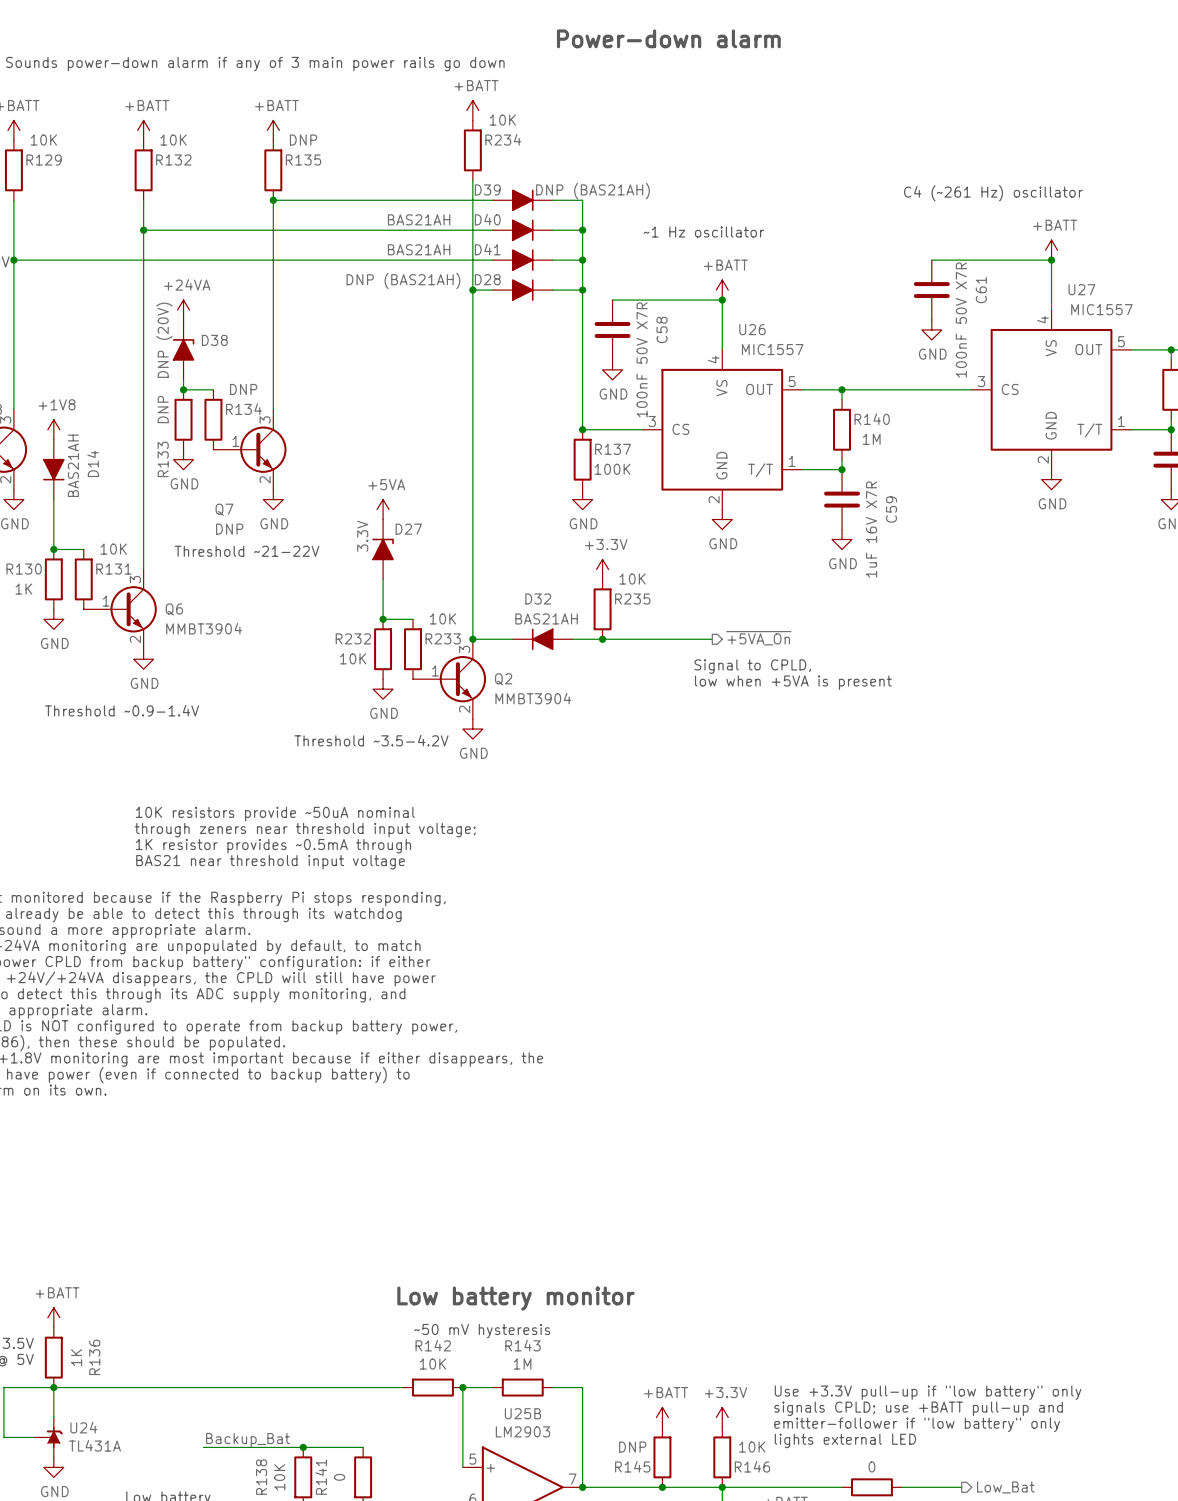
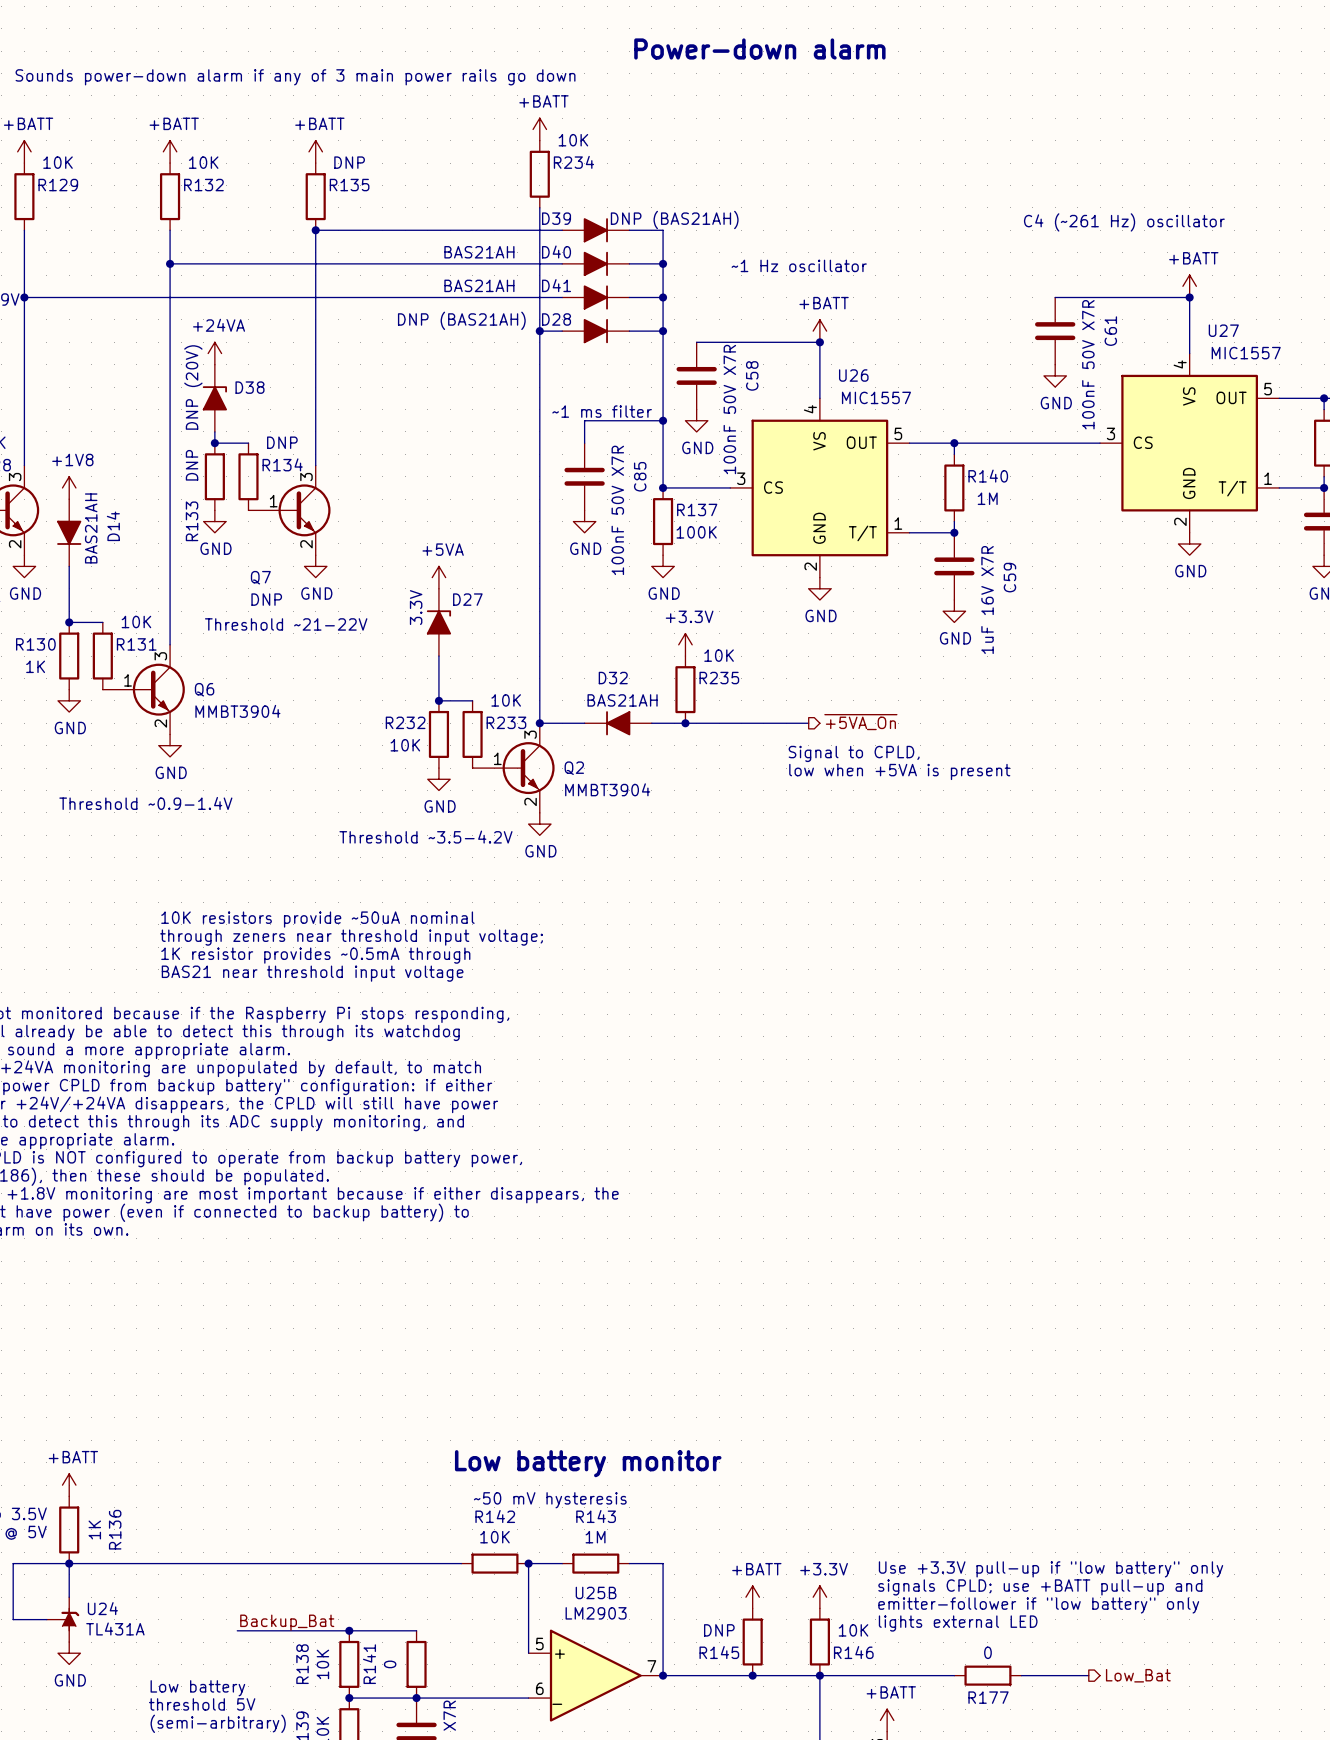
text: none -> ~1 ms filter (602, 411)
wire: none -> (663, 420) (584, 420) (584, 443)
junction: none -> (663, 420)
C85: none -> 100nF 50V X7R (584, 476)
power symbol: none -> GND (584, 521)

